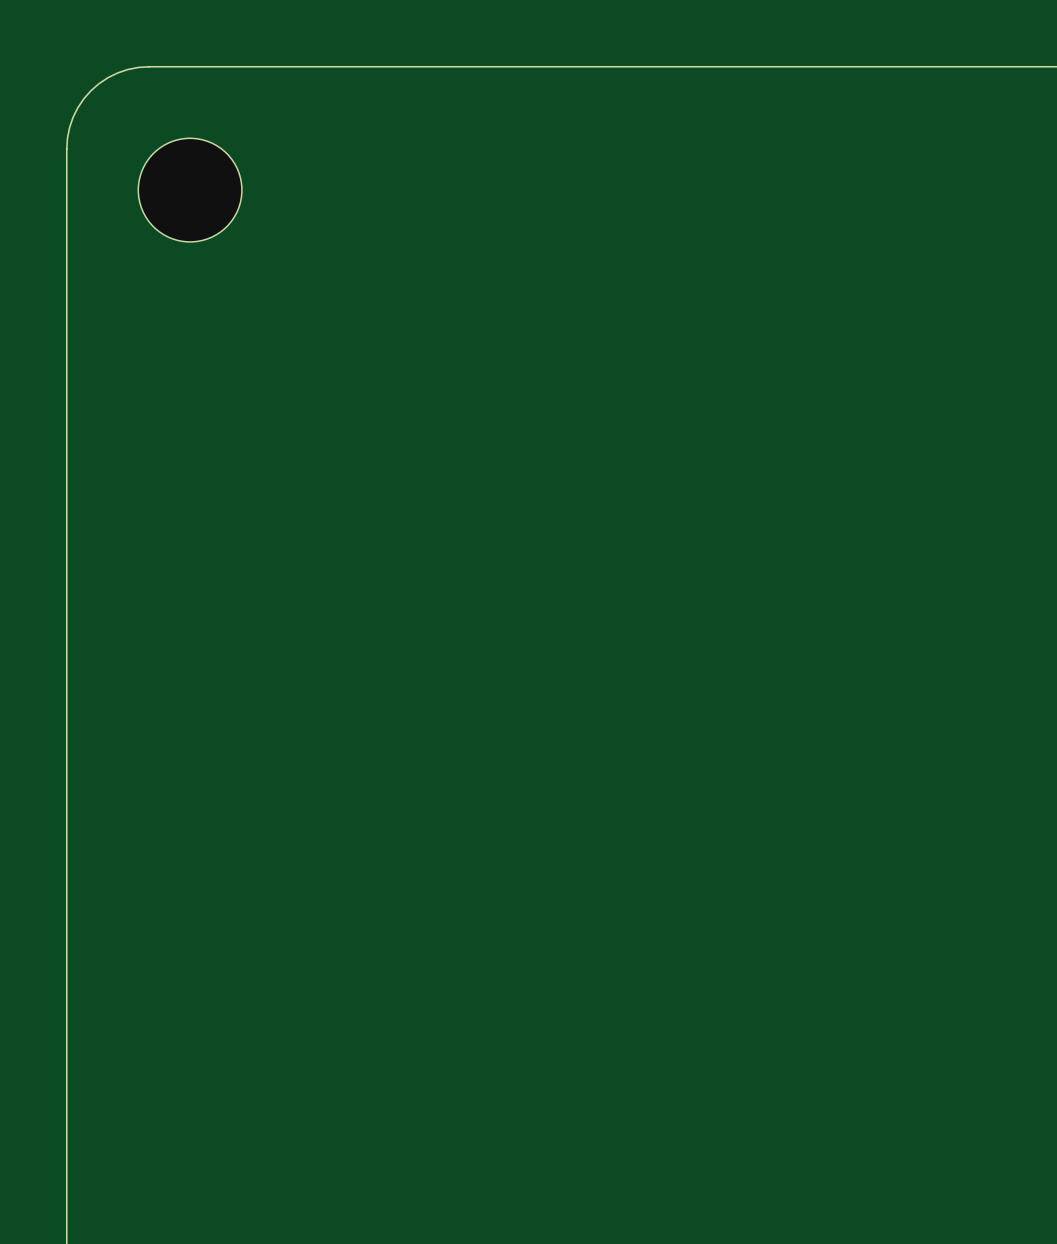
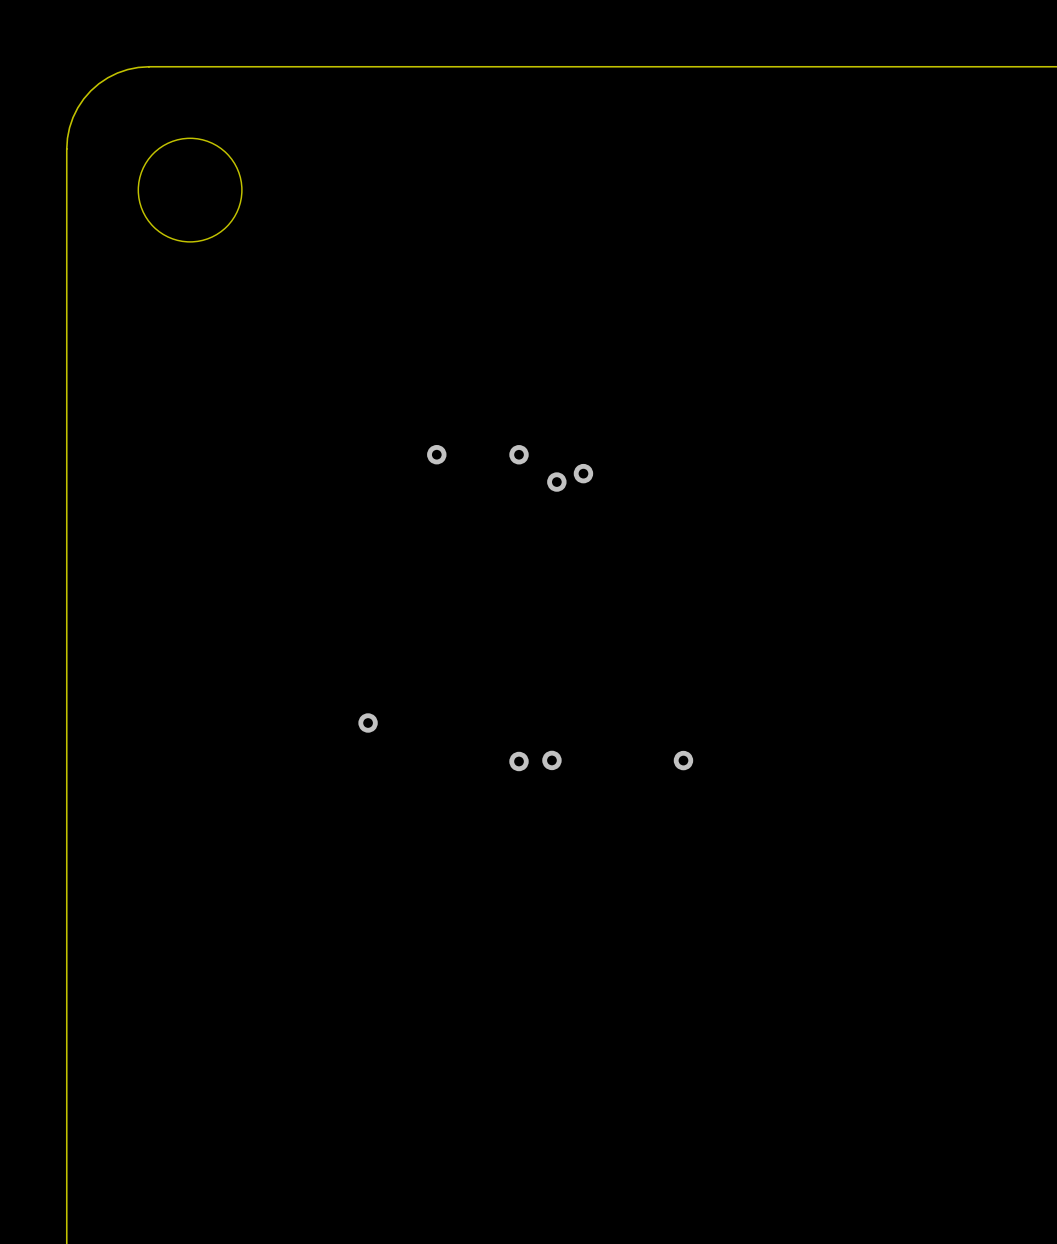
via: none -> (436, 454)
via: none -> (519, 454)
via: none -> (583, 473)
via: none -> (556, 482)
via: none -> (368, 722)
via: none -> (551, 760)
via: none -> (683, 760)
via: none -> (519, 761)

